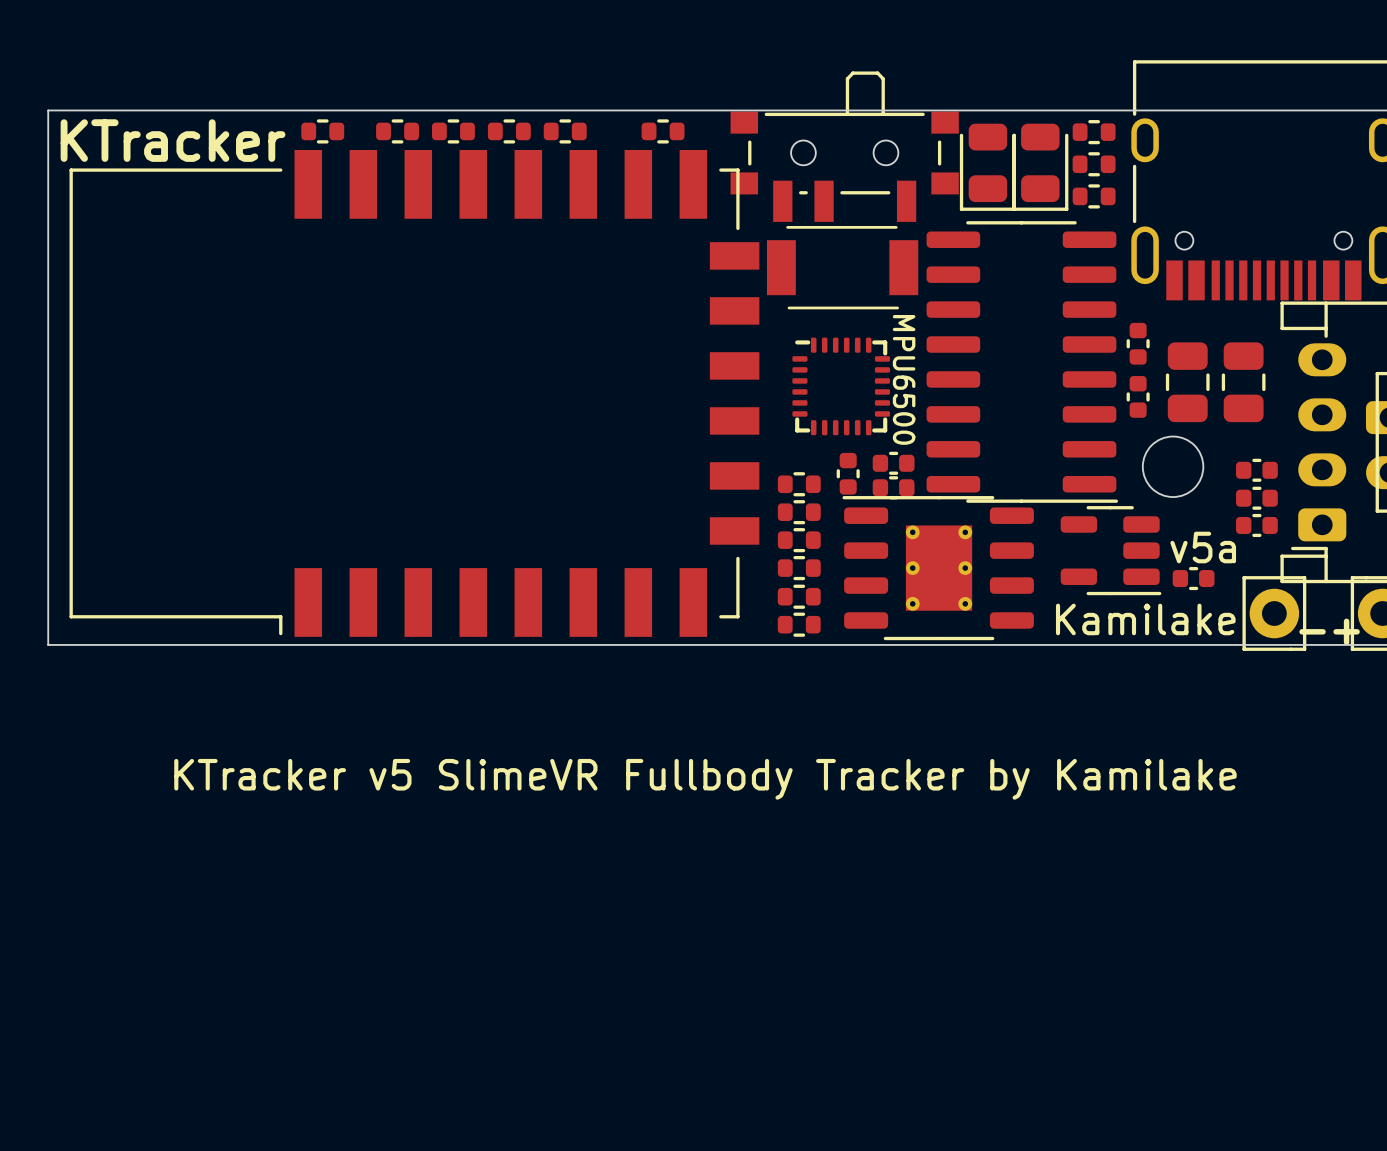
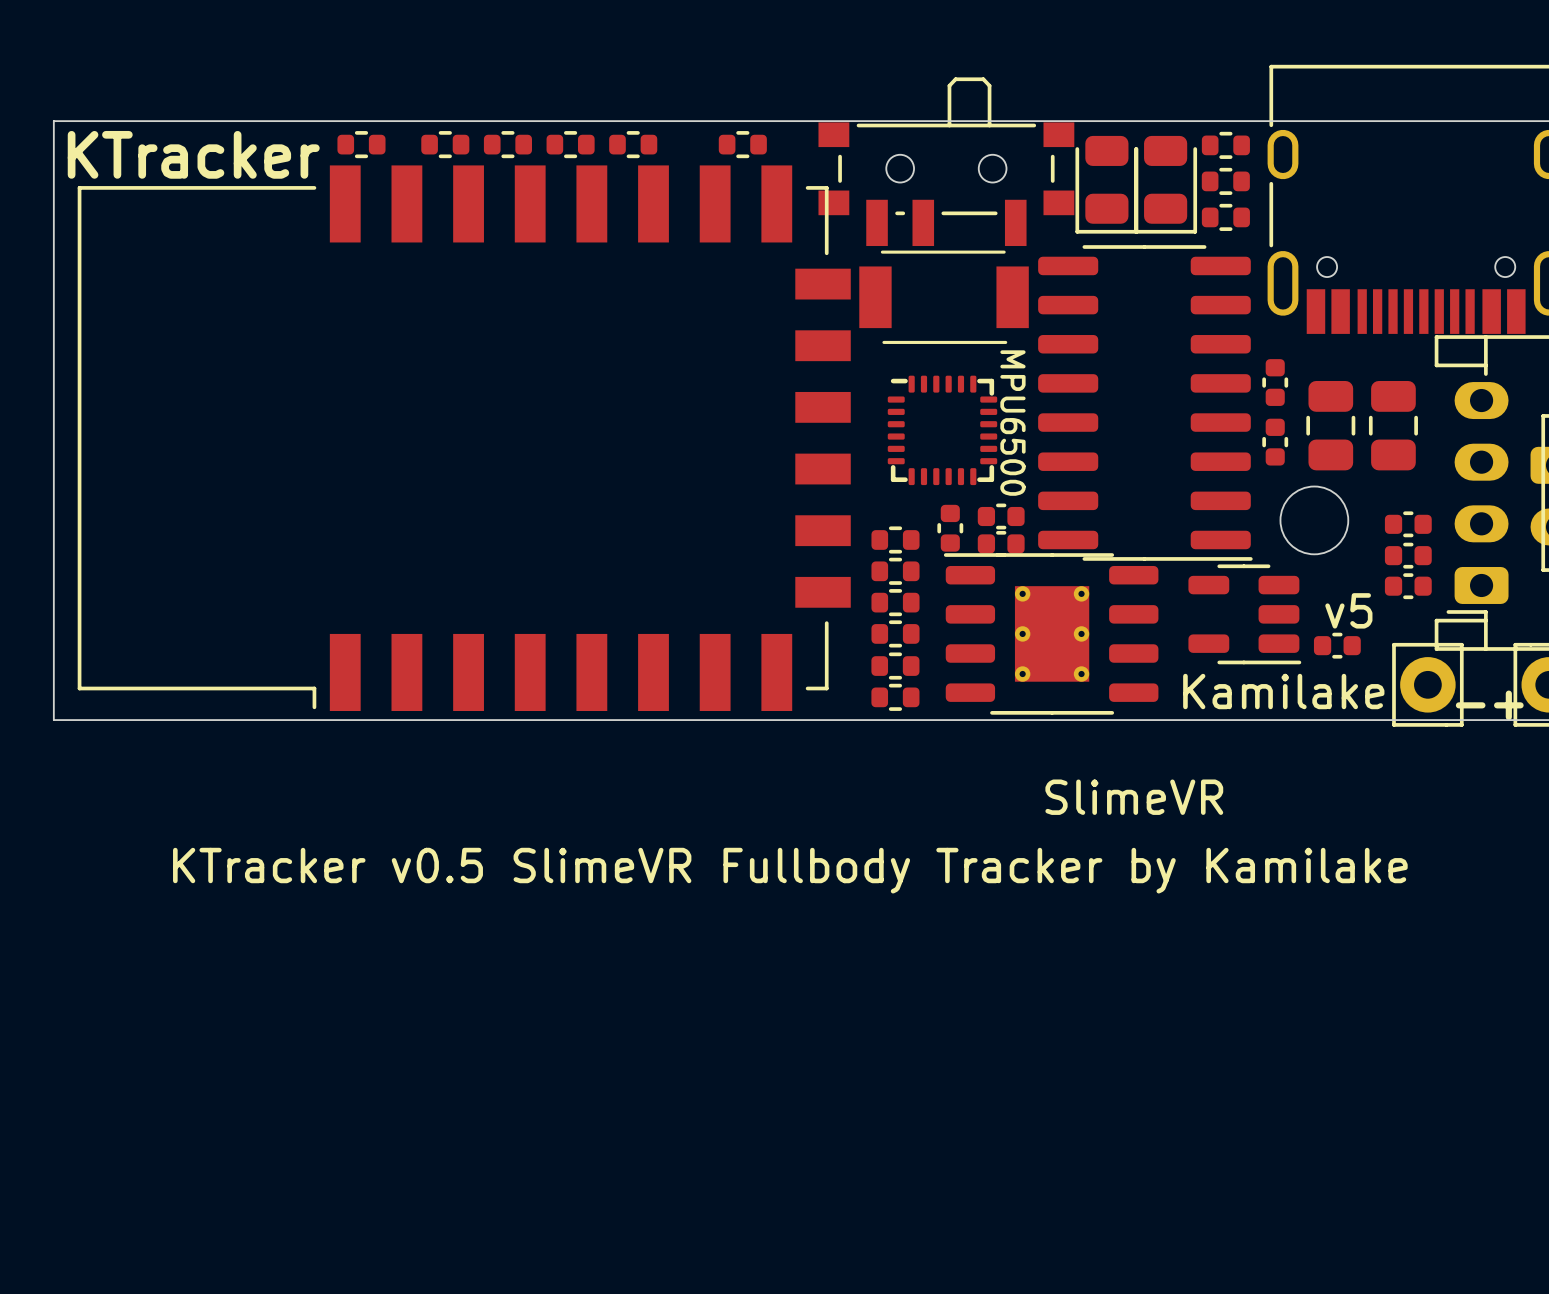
text: v5a (1203, 547) -> v5 (1348, 610)
text: none -> SlimeVR (1134, 797)
text: KTracker v5 SlimeVR Fullbody Tracker by Kamilake (705, 779) -> KTracker v0.5 SlimeVR Fullbody Tracker by Kamilake (790, 870)

